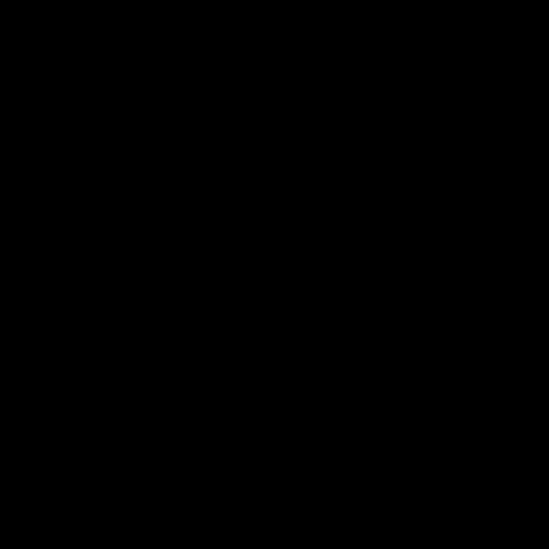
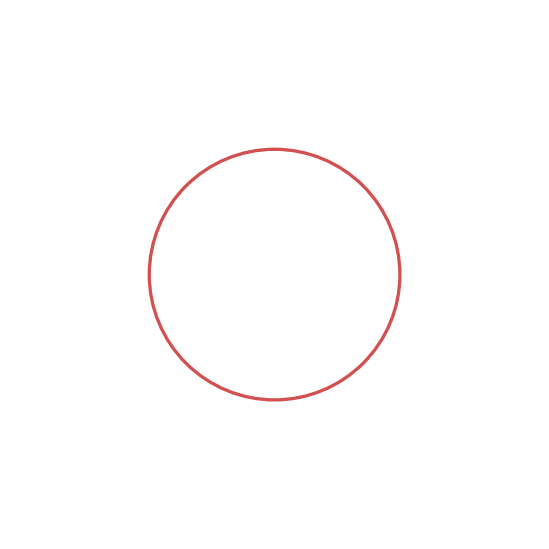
drawing: none -> [147, 147, 402, 402]

